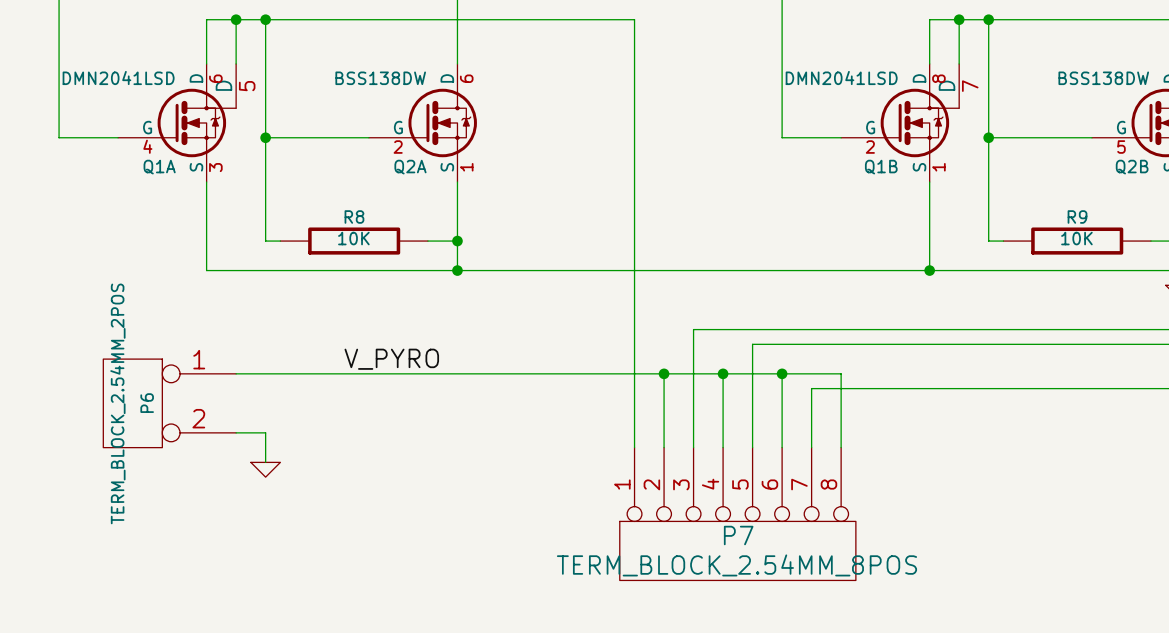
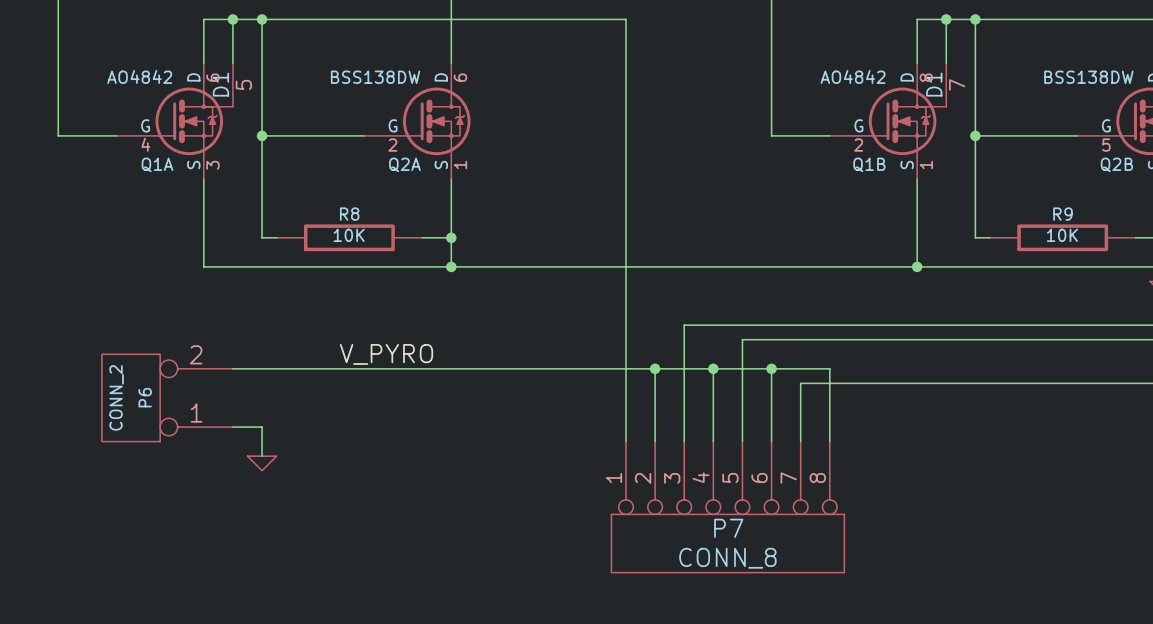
Q1A value: DMN2041LSD (118, 78) -> AO4842 (139, 76)
Q1B value: DMN2041LSD (841, 78) -> AO4842 (853, 76)
Q1A pin name: D (223, 85) -> D1 (220, 84)
Q1B pin name: D (947, 85) -> D1 (934, 84)
P6 value: TERM_BLOCK_2.54MM_2POS (117, 403) -> CONN_2 (116, 397)
P6 flip: as is (132, 403) -> up-down (131, 397)
P7 value: TERM_BLOCK_2.54MM_8POS (736, 565) -> CONN_8 (727, 558)

